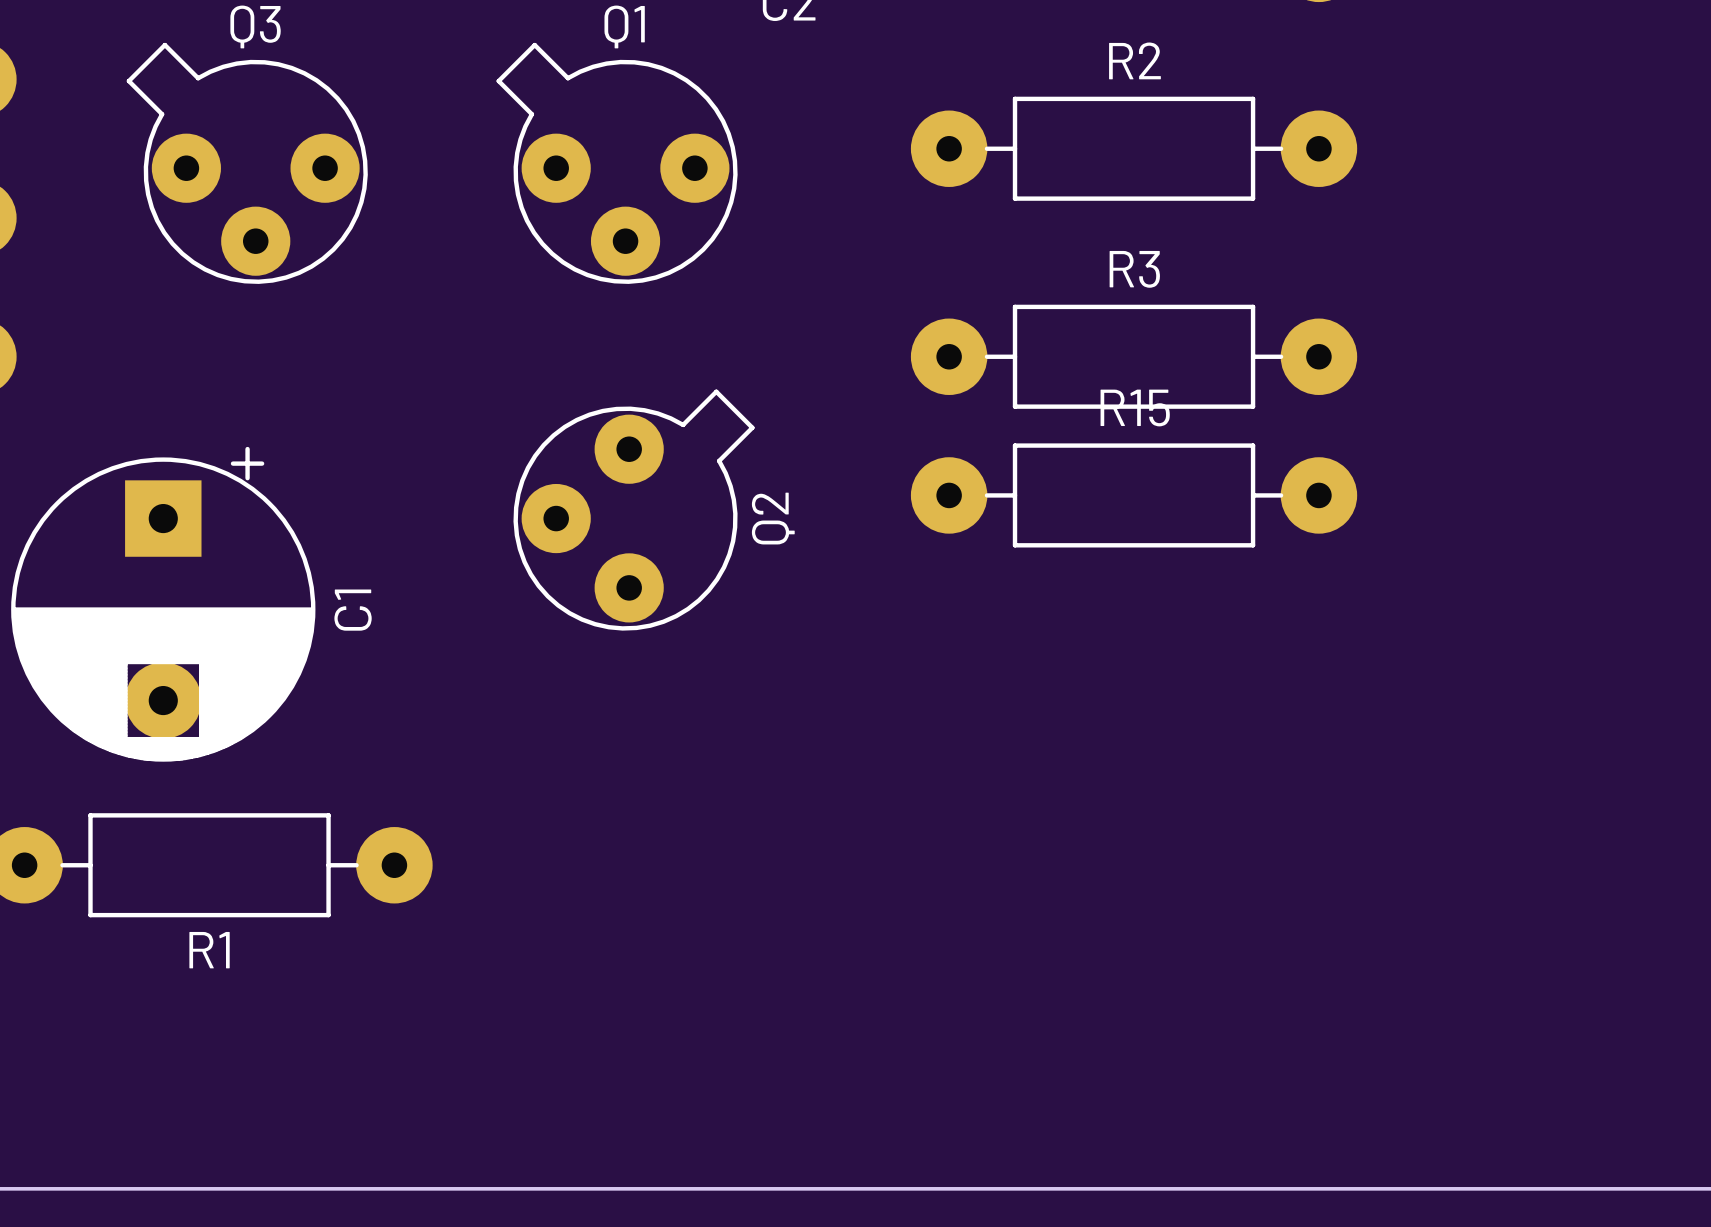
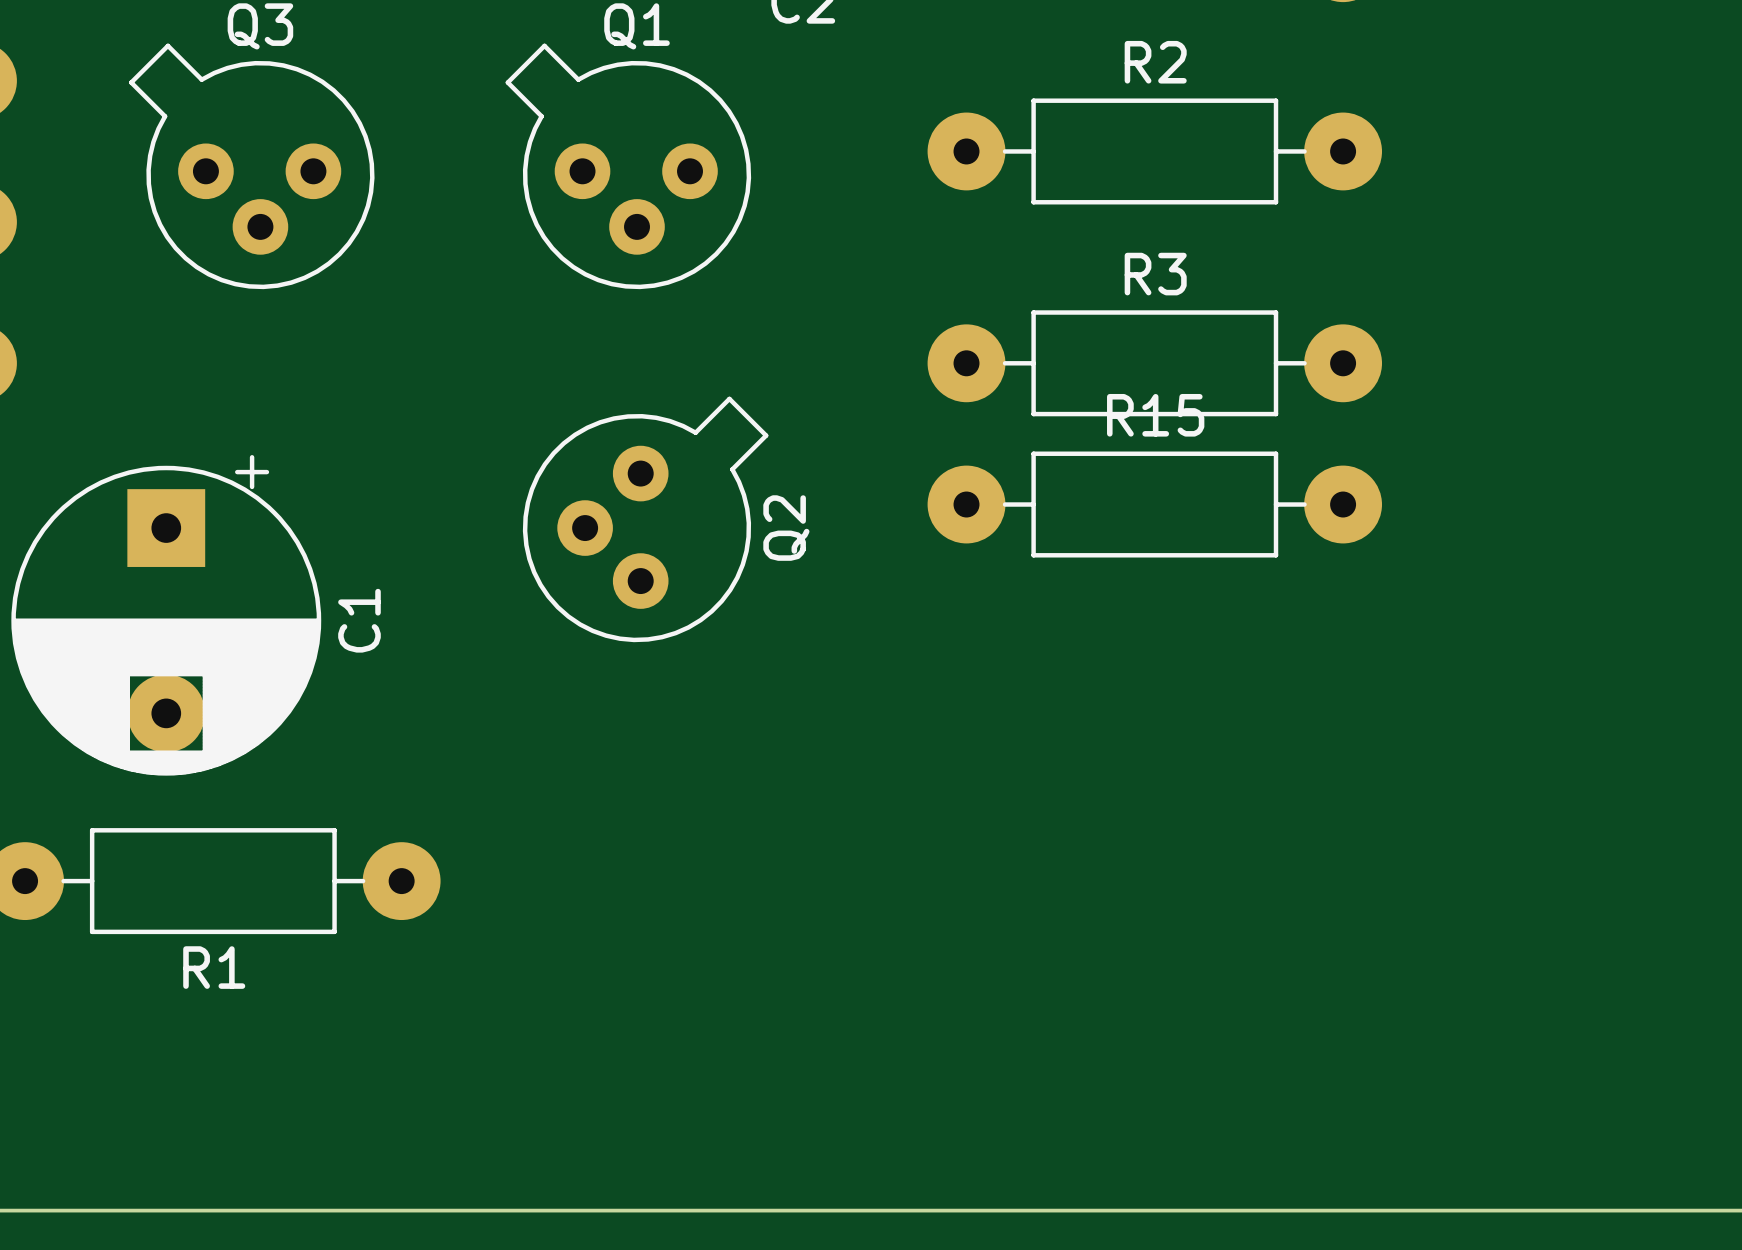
Q3 footprint: [126, 42, 368, 284] -> [129, 43, 375, 290]
Q1 footprint: [496, 42, 738, 284] -> [505, 43, 752, 290]
Q2 footprint: [513, 389, 755, 631] -> [522, 396, 769, 643]

